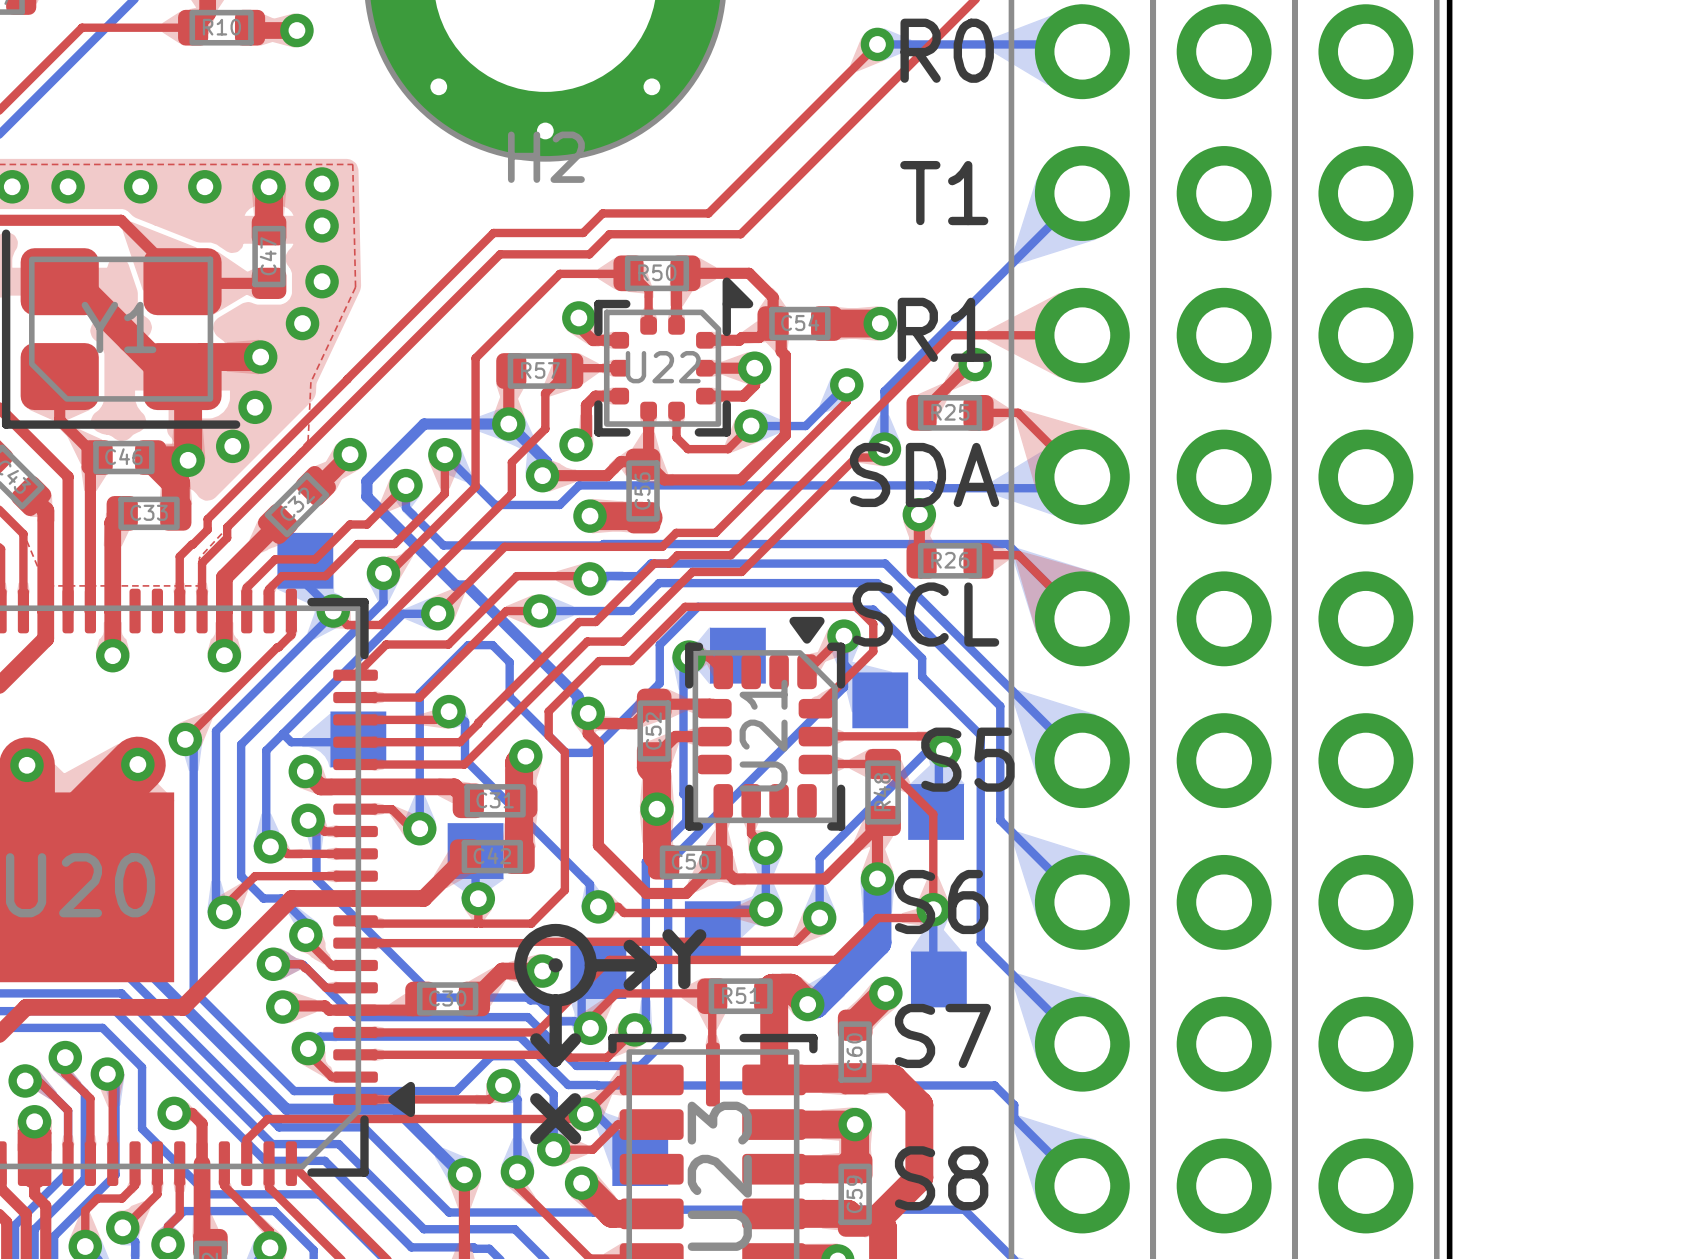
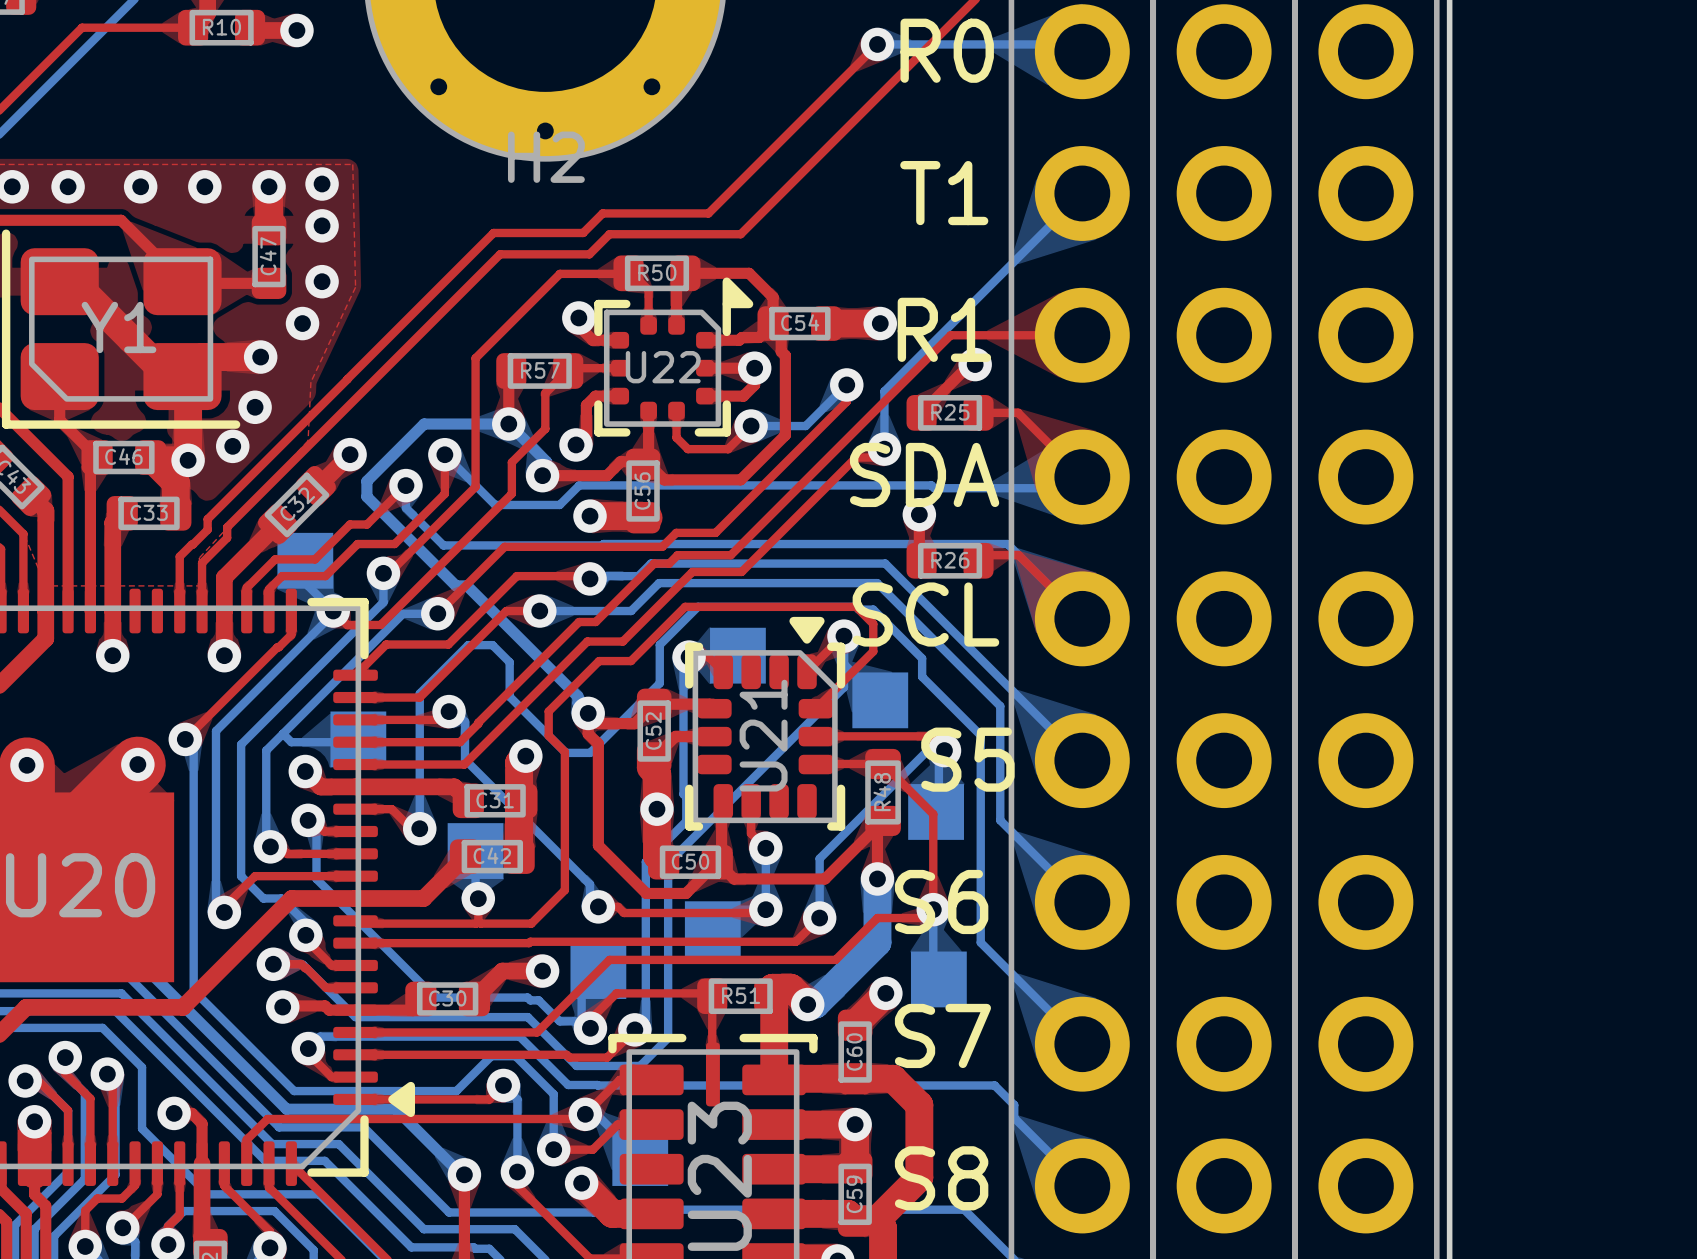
drawing: [514, 923, 707, 1145] -> none

